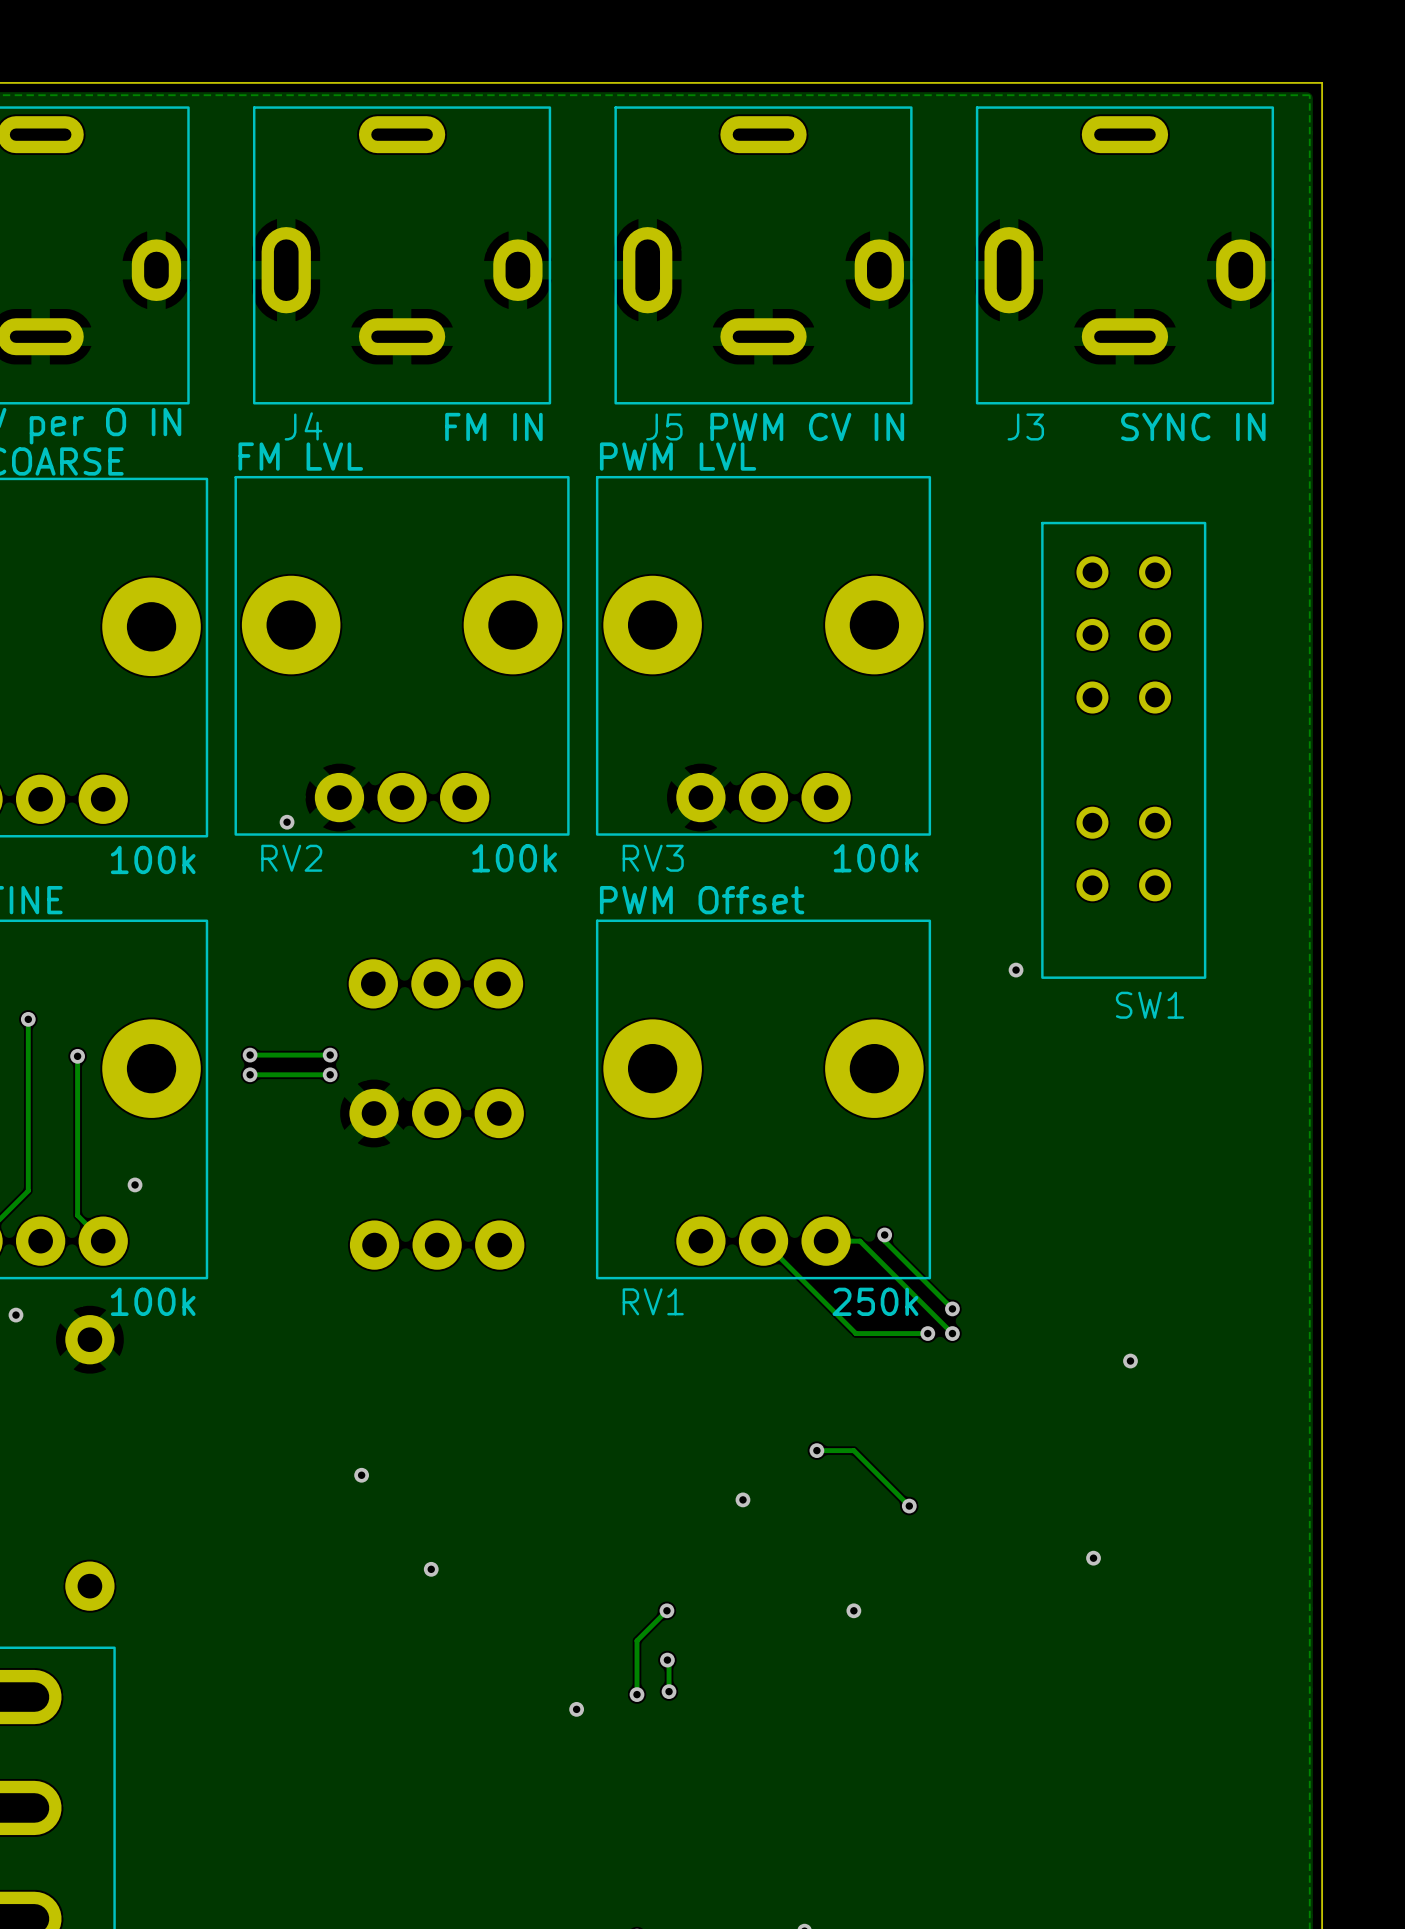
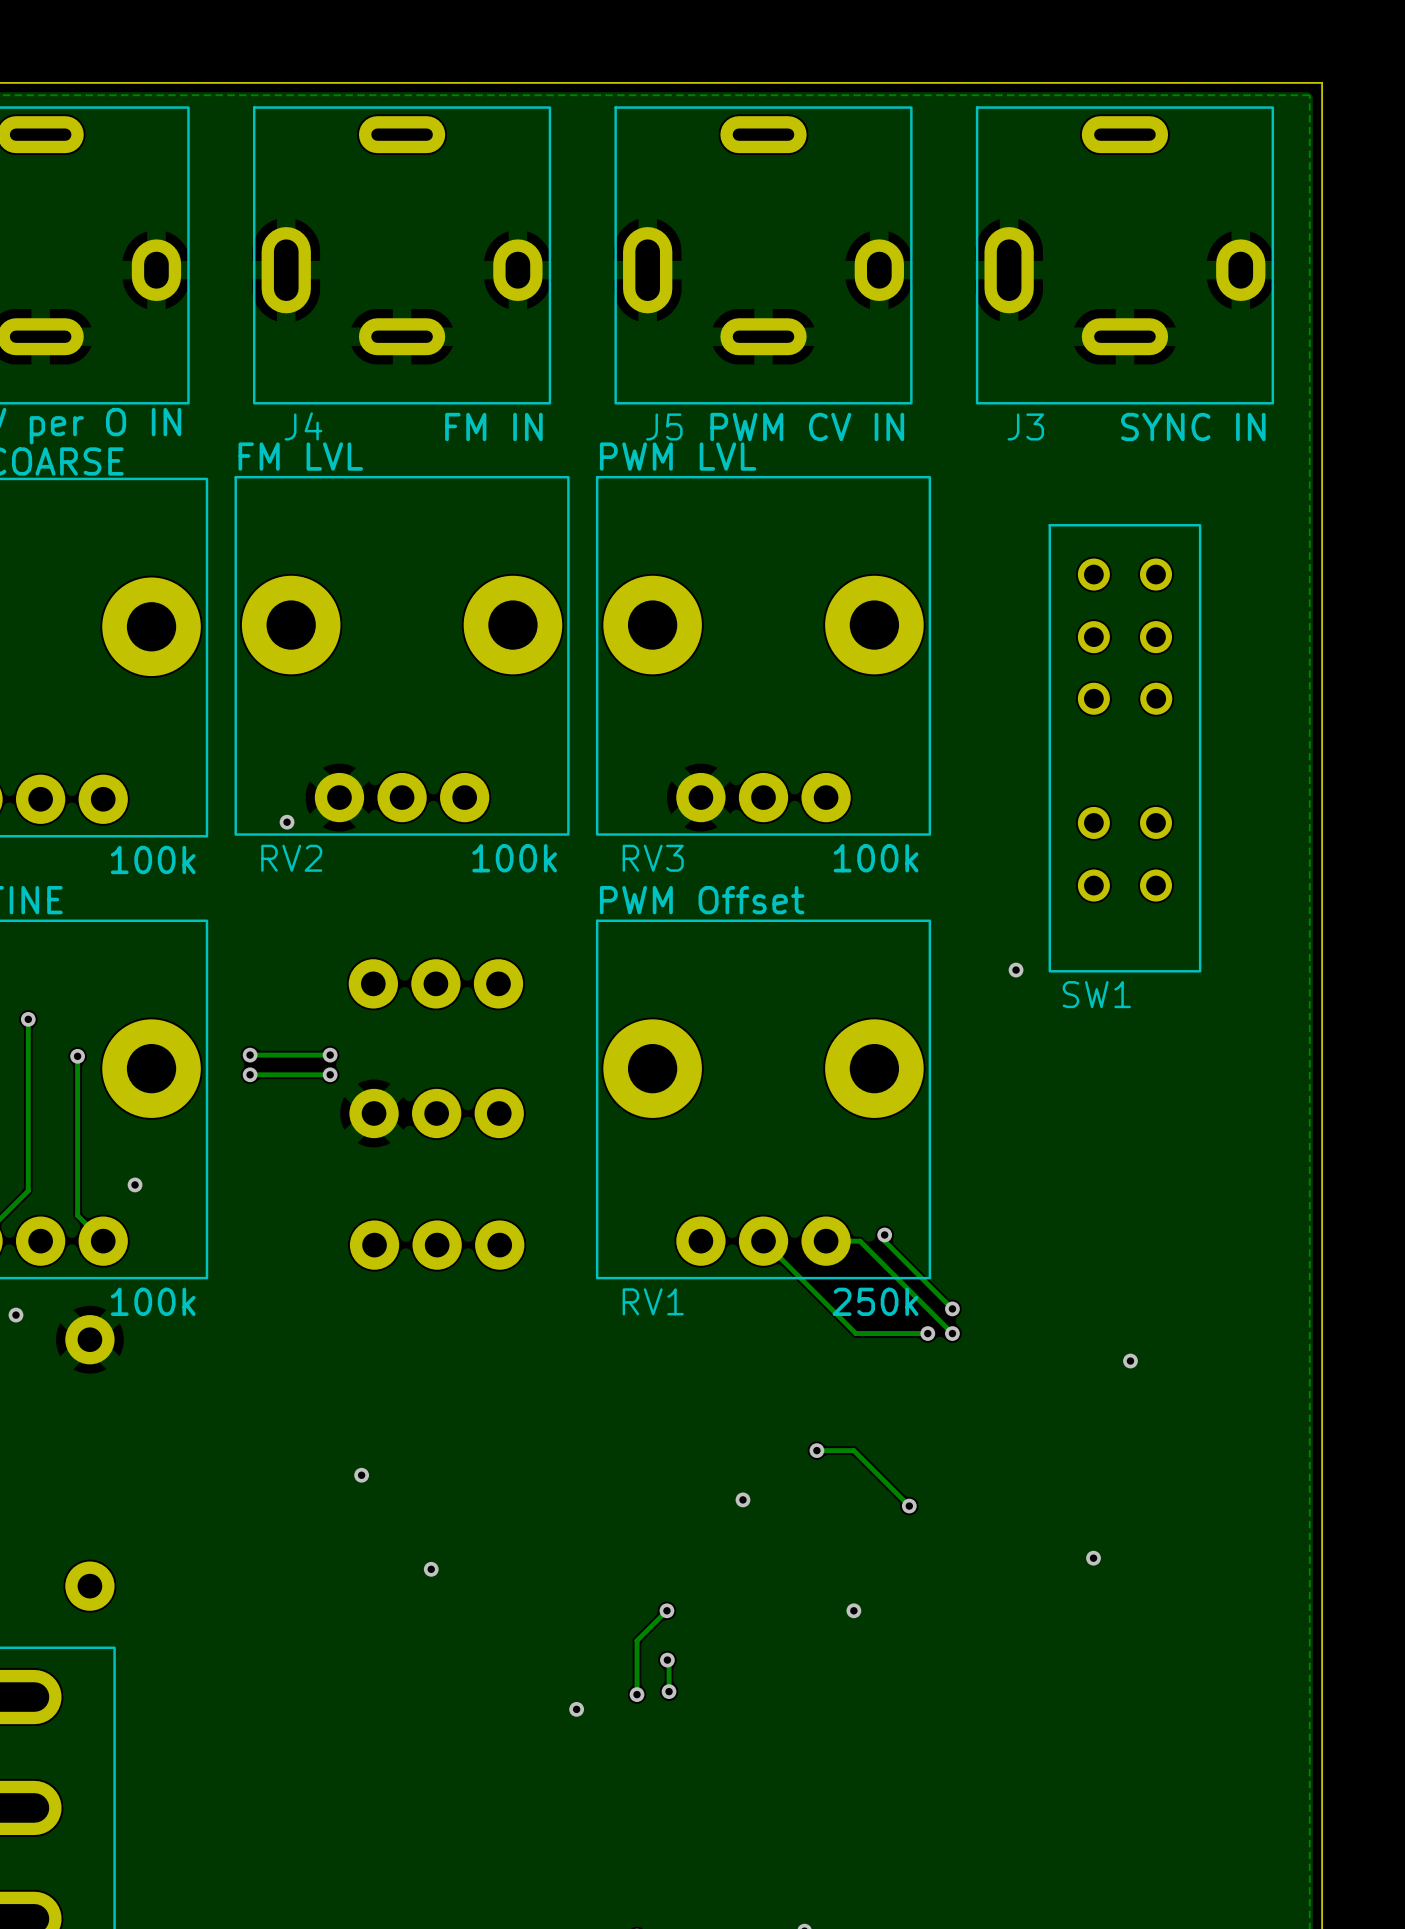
SW1 footprint: [1041, 521, 1207, 979] -> [1048, 524, 1202, 973]
SW1 name position: SW1 (1149, 1005) -> SW1 (1096, 994)

